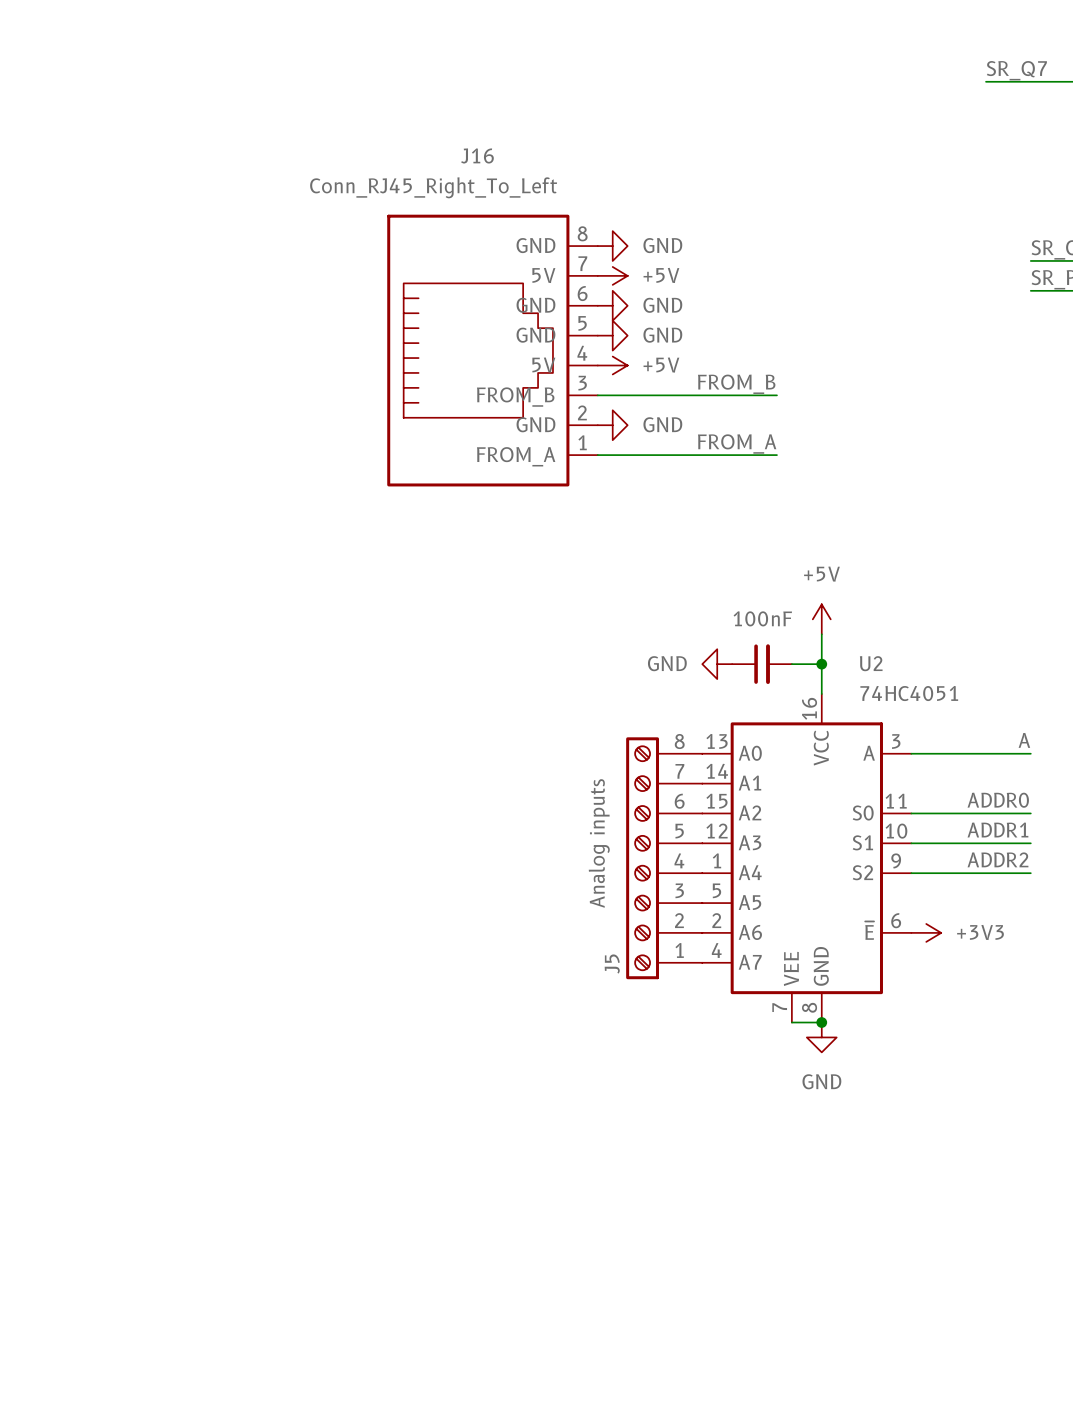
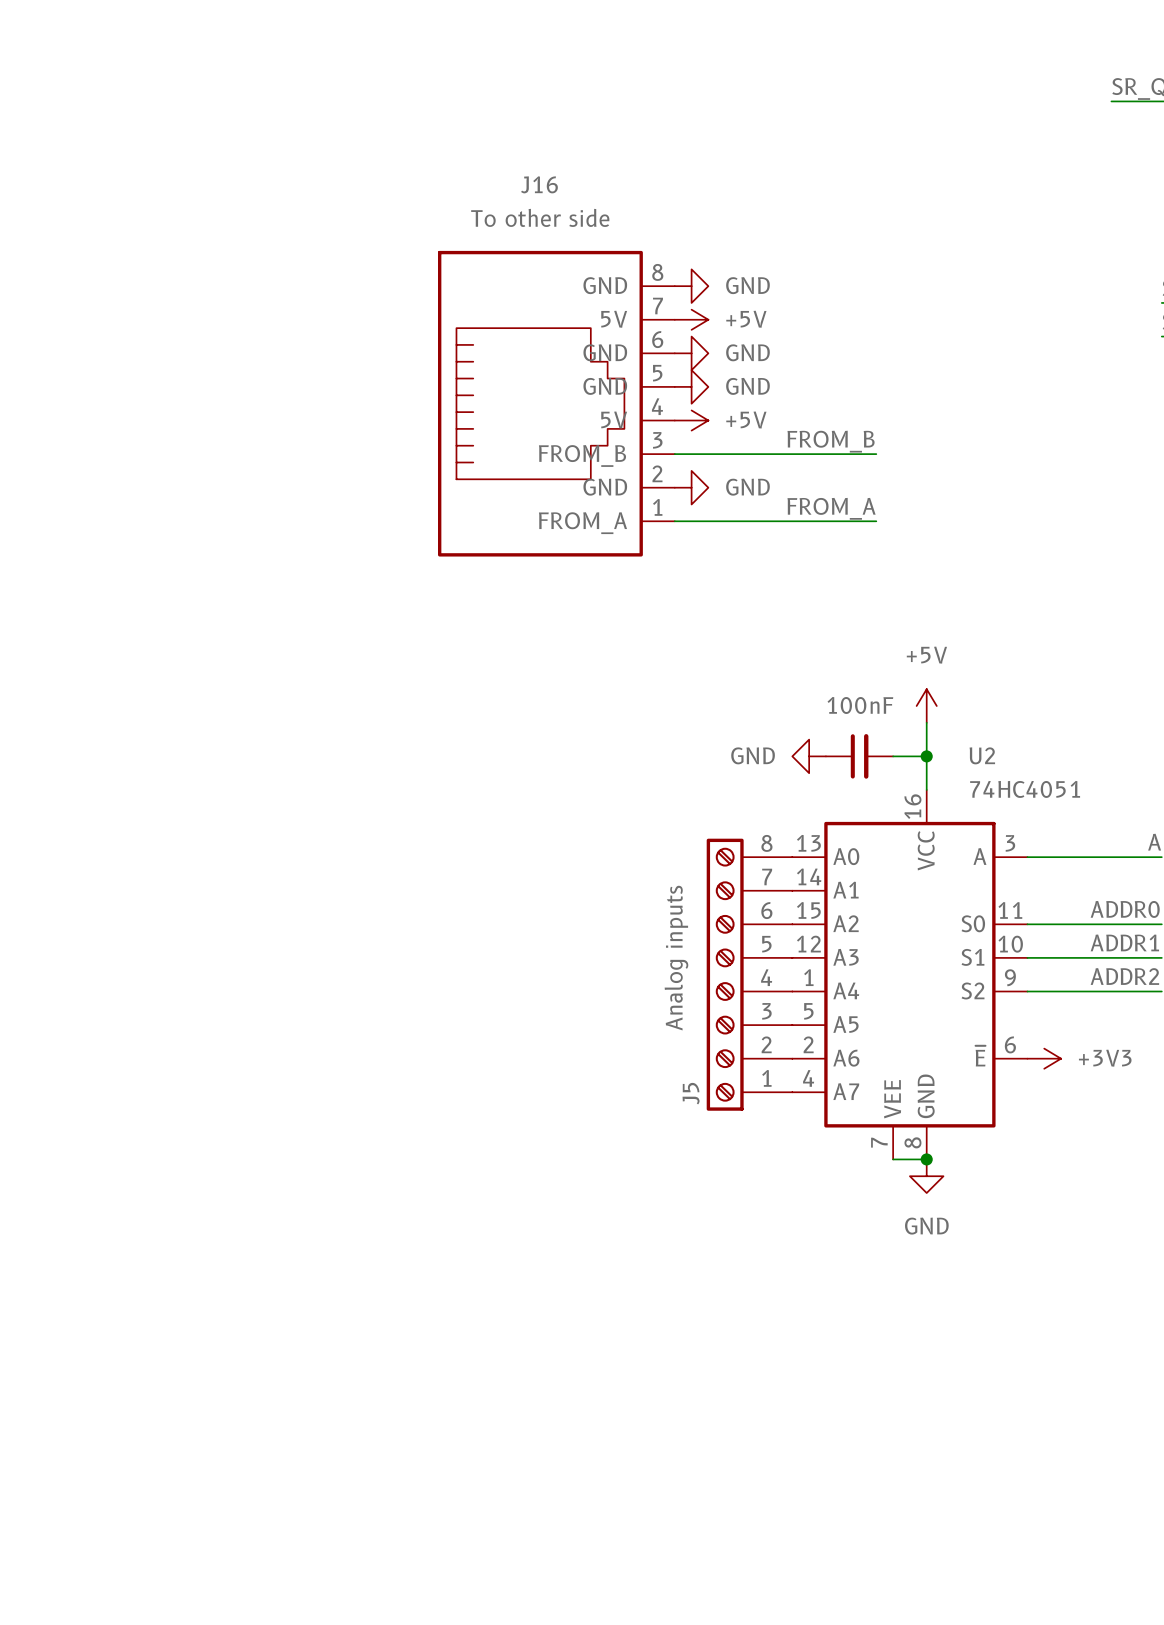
J16 value: Conn_RJ45_Right_To_Left (433, 187) -> To other side (540, 217)

